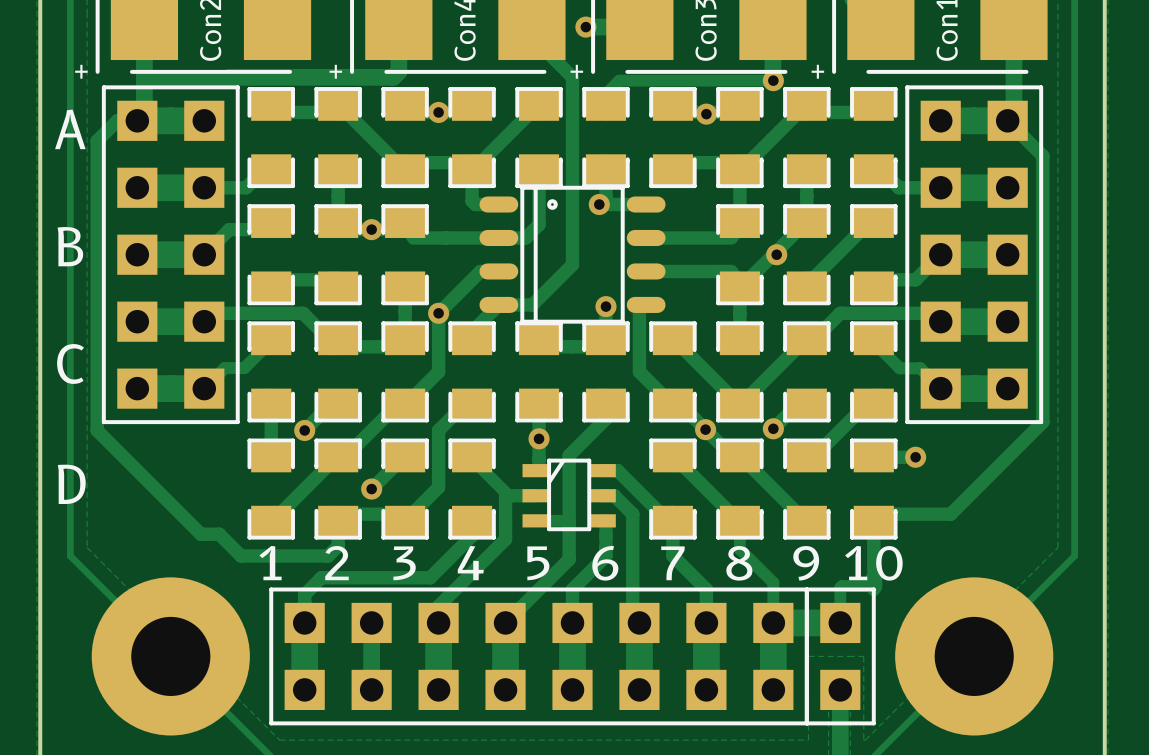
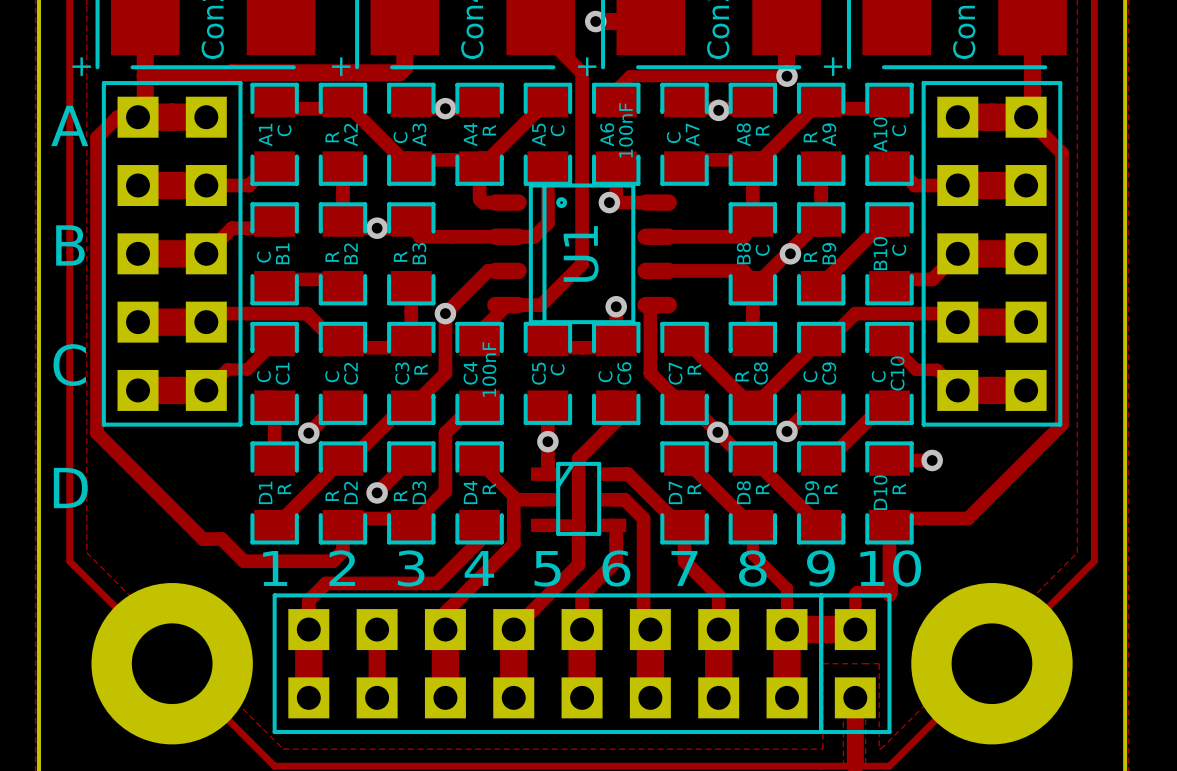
A4 value: none -> R (489, 130)
A6 value: none -> 100nF (625, 130)
A8 value: none -> R (762, 130)
A1 value: none -> C (284, 130)
A5 value: none -> C (557, 130)
A10 value: none -> C (899, 130)
A1 name: none -> A1 (265, 135)
A2 name: none -> A2 (350, 135)
A3 name: none -> A3 (419, 134)
A4 name: none -> A4 (470, 134)
A5 name: none -> A5 (539, 135)
A6 name: none -> A6 (607, 134)
A7 name: none -> A7 (692, 134)
A8 name: none -> A8 (743, 134)
A9 name: none -> A9 (829, 134)
A10 name: none -> A10 (880, 134)
A2 value: none -> R (332, 137)
A3 value: none -> C (400, 137)
A7 value: none -> C (673, 137)
A9 value: none -> R (810, 137)
B8 value: none -> C (762, 250)
B10 value: none -> C (899, 250)
B8 name: none -> B8 (743, 253)
B9 name: none -> B9 (829, 253)
B10 name: none -> B10 (880, 253)
B1 name: none -> B1 (282, 253)
B2 name: none -> B2 (350, 253)
B3 name: none -> B3 (419, 253)
U1 name: none -> U1 (581, 253)
B2 value: none -> R (332, 256)
B3 value: none -> R (400, 256)
B9 value: none -> R (810, 256)
B1 value: none -> C (263, 257)
C4 value: none -> 100nF (489, 369)
C3 value: none -> R (421, 369)
C5 value: none -> C (557, 369)
C7 value: none -> R (694, 369)
C1 name: none -> C1 (282, 373)
C2 name: none -> C2 (351, 373)
C3 name: none -> C3 (402, 373)
C4 name: none -> C4 (470, 373)
C5 name: none -> C5 (538, 373)
C6 name: none -> C6 (624, 373)
C7 name: none -> C7 (675, 373)
C8 name: none -> C8 (760, 373)
C9 name: none -> C9 (829, 373)
C10 name: none -> C10 (897, 373)
C8 value: none -> R (742, 376)
C1 value: none -> C (263, 376)
C2 value: none -> C (332, 376)
C6 value: none -> C (605, 376)
C9 value: none -> C (810, 376)
C10 value: none -> C (878, 376)
D1 value: none -> R (284, 488)
D4 value: none -> R (489, 488)
D7 value: none -> R (694, 488)
D8 value: none -> R (762, 488)
D9 value: none -> R (830, 488)
D10 value: none -> R (899, 488)
D1 name: none -> D1 (265, 492)
D2 name: none -> D2 (350, 492)
D3 name: none -> D3 (419, 492)
D4 name: none -> D4 (470, 492)
D7 name: none -> D7 (675, 492)
D8 name: none -> D8 (743, 492)
D9 name: none -> D9 (812, 492)
D10 name: none -> D10 (880, 492)
D2 value: none -> R (332, 495)
D3 value: none -> R (400, 495)

